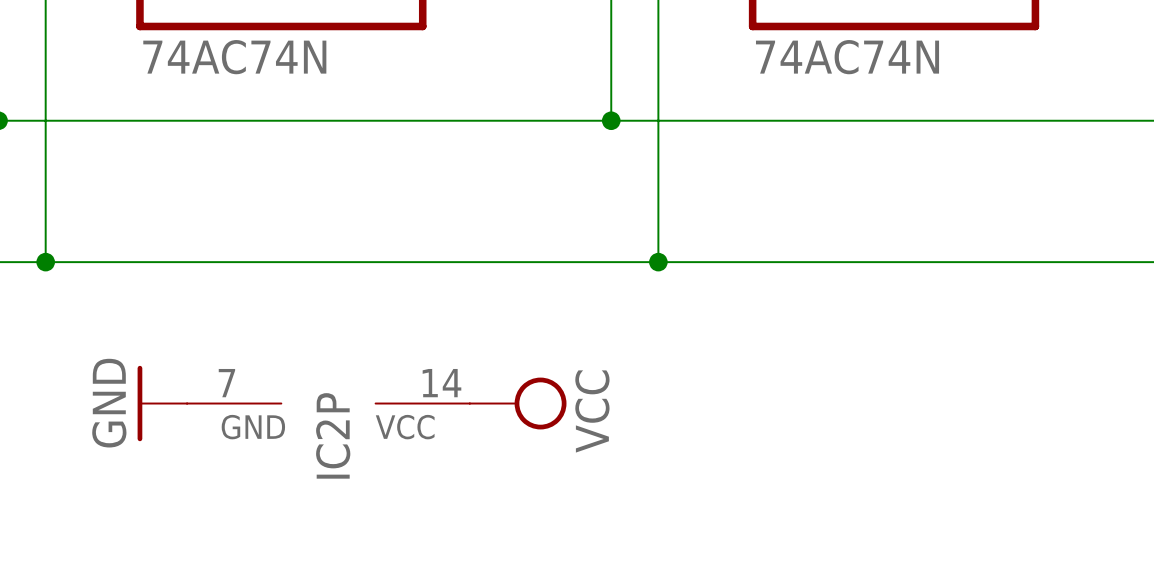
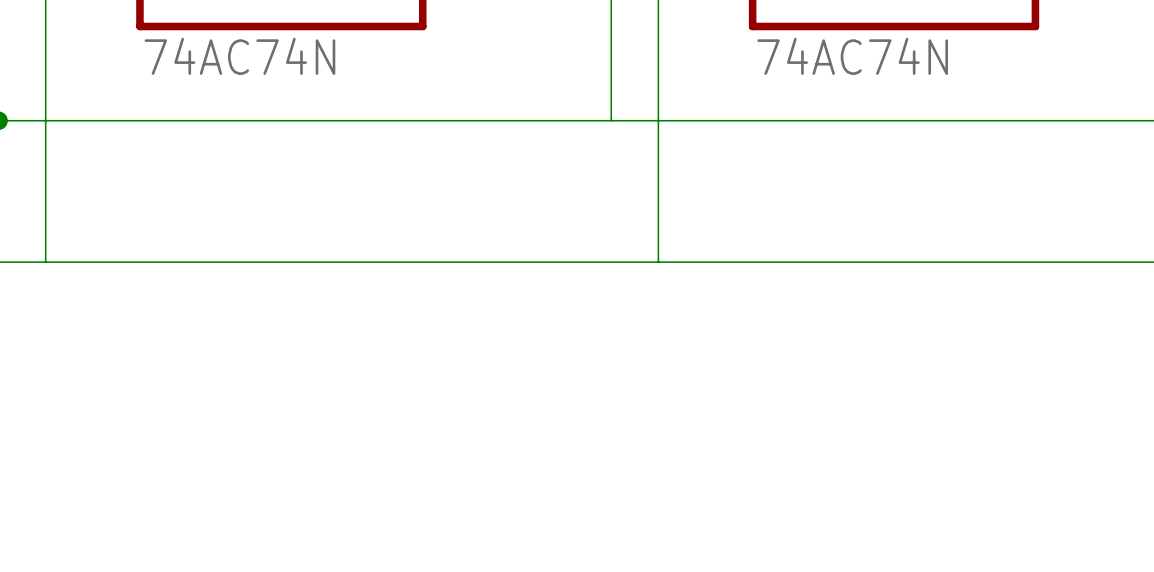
junction: (611, 120) -> none
junction: (45, 262) -> none
junction: (658, 262) -> none
power symbol: GND (162, 403) -> none
IC2P: (328, 403) -> none
power symbol: VCC (518, 403) -> none

